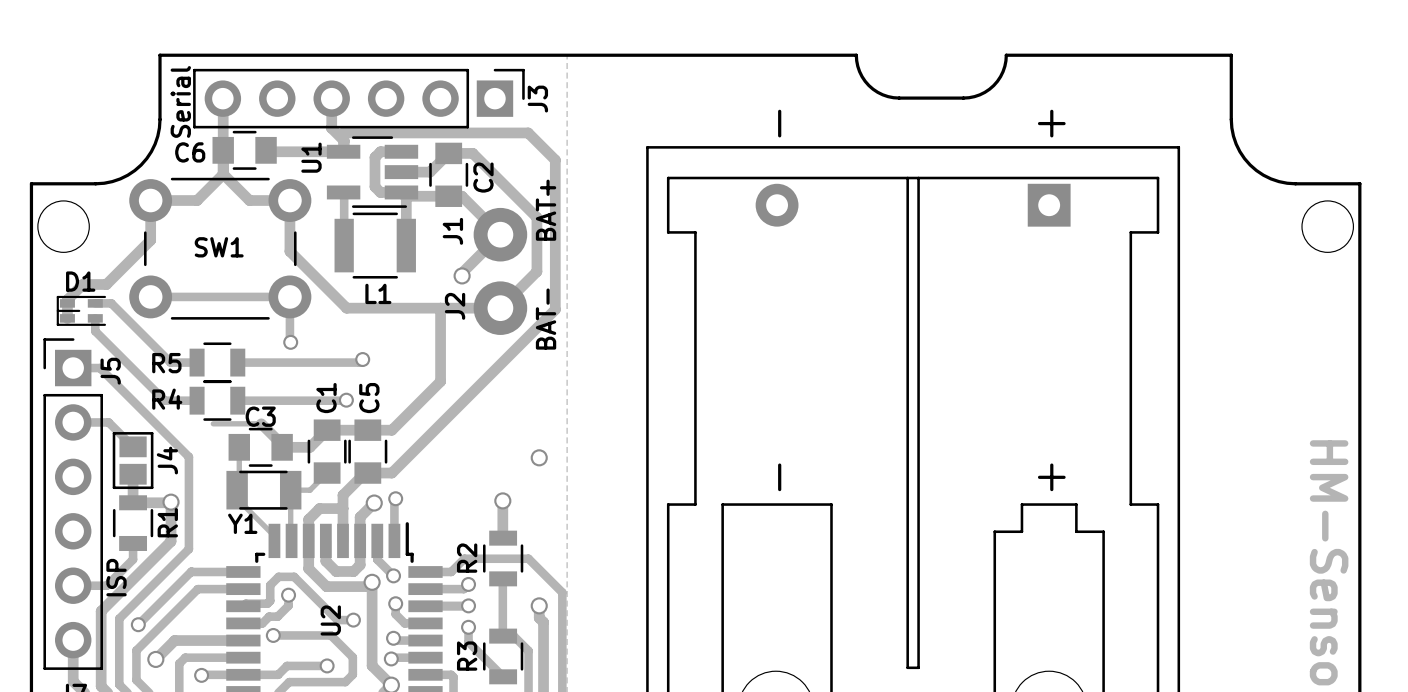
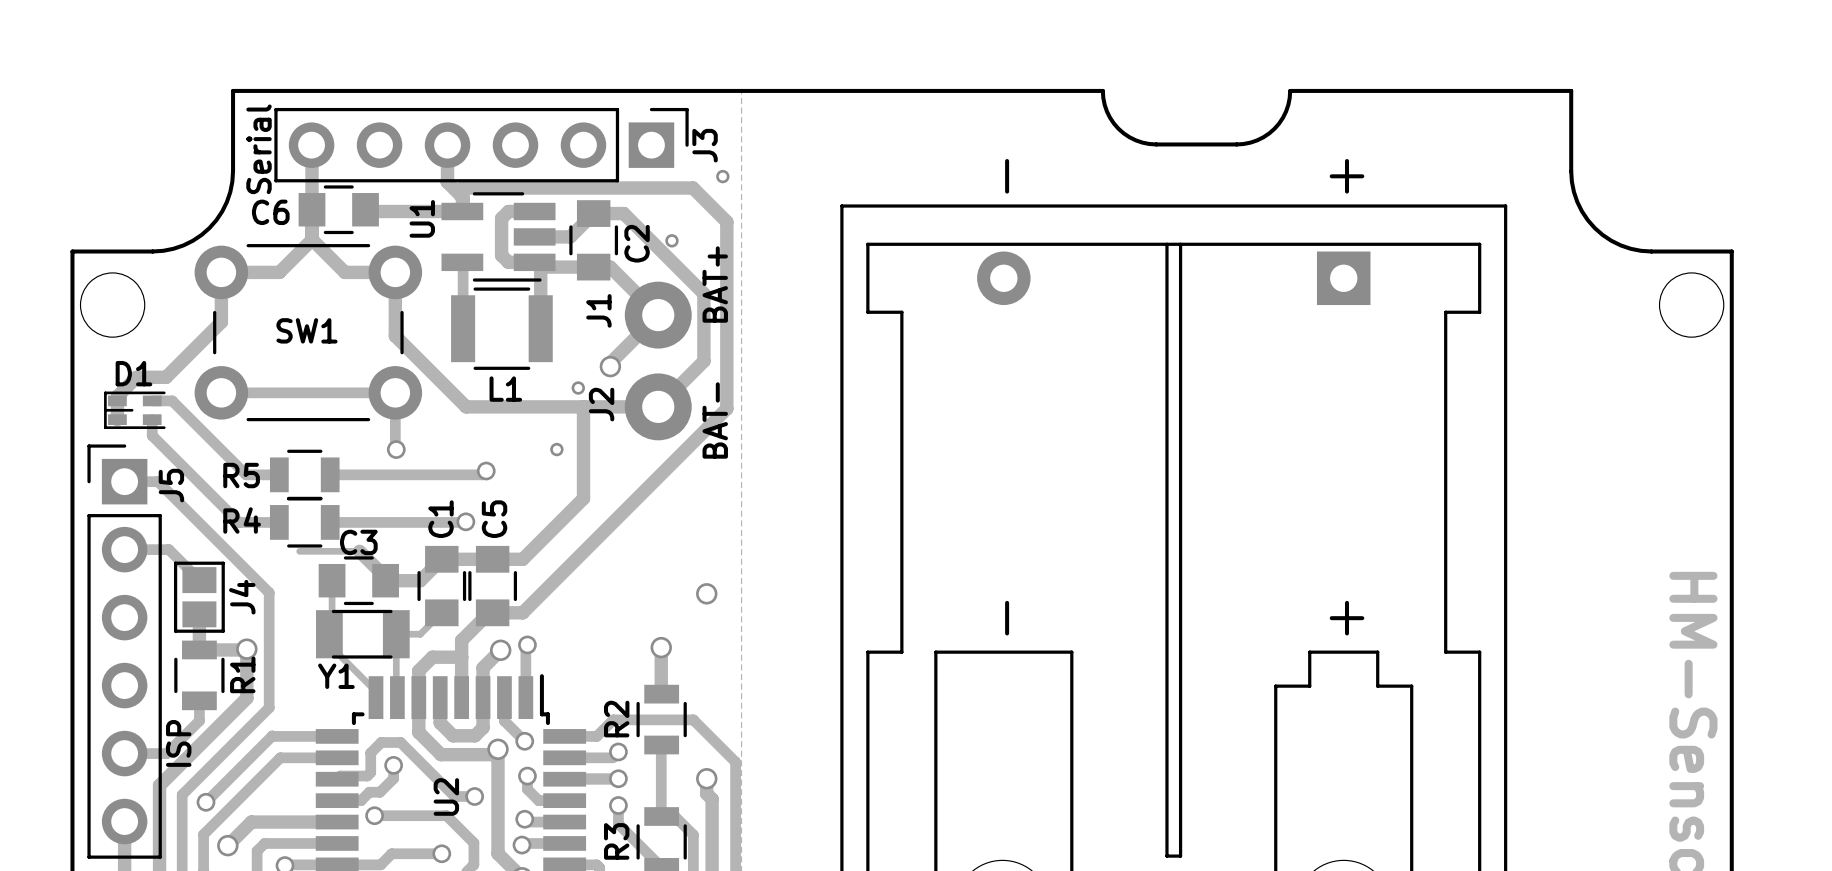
part: none -> (722, 176)
part: none -> (671, 240)
part: none -> (578, 388)
part: none -> (556, 449)

